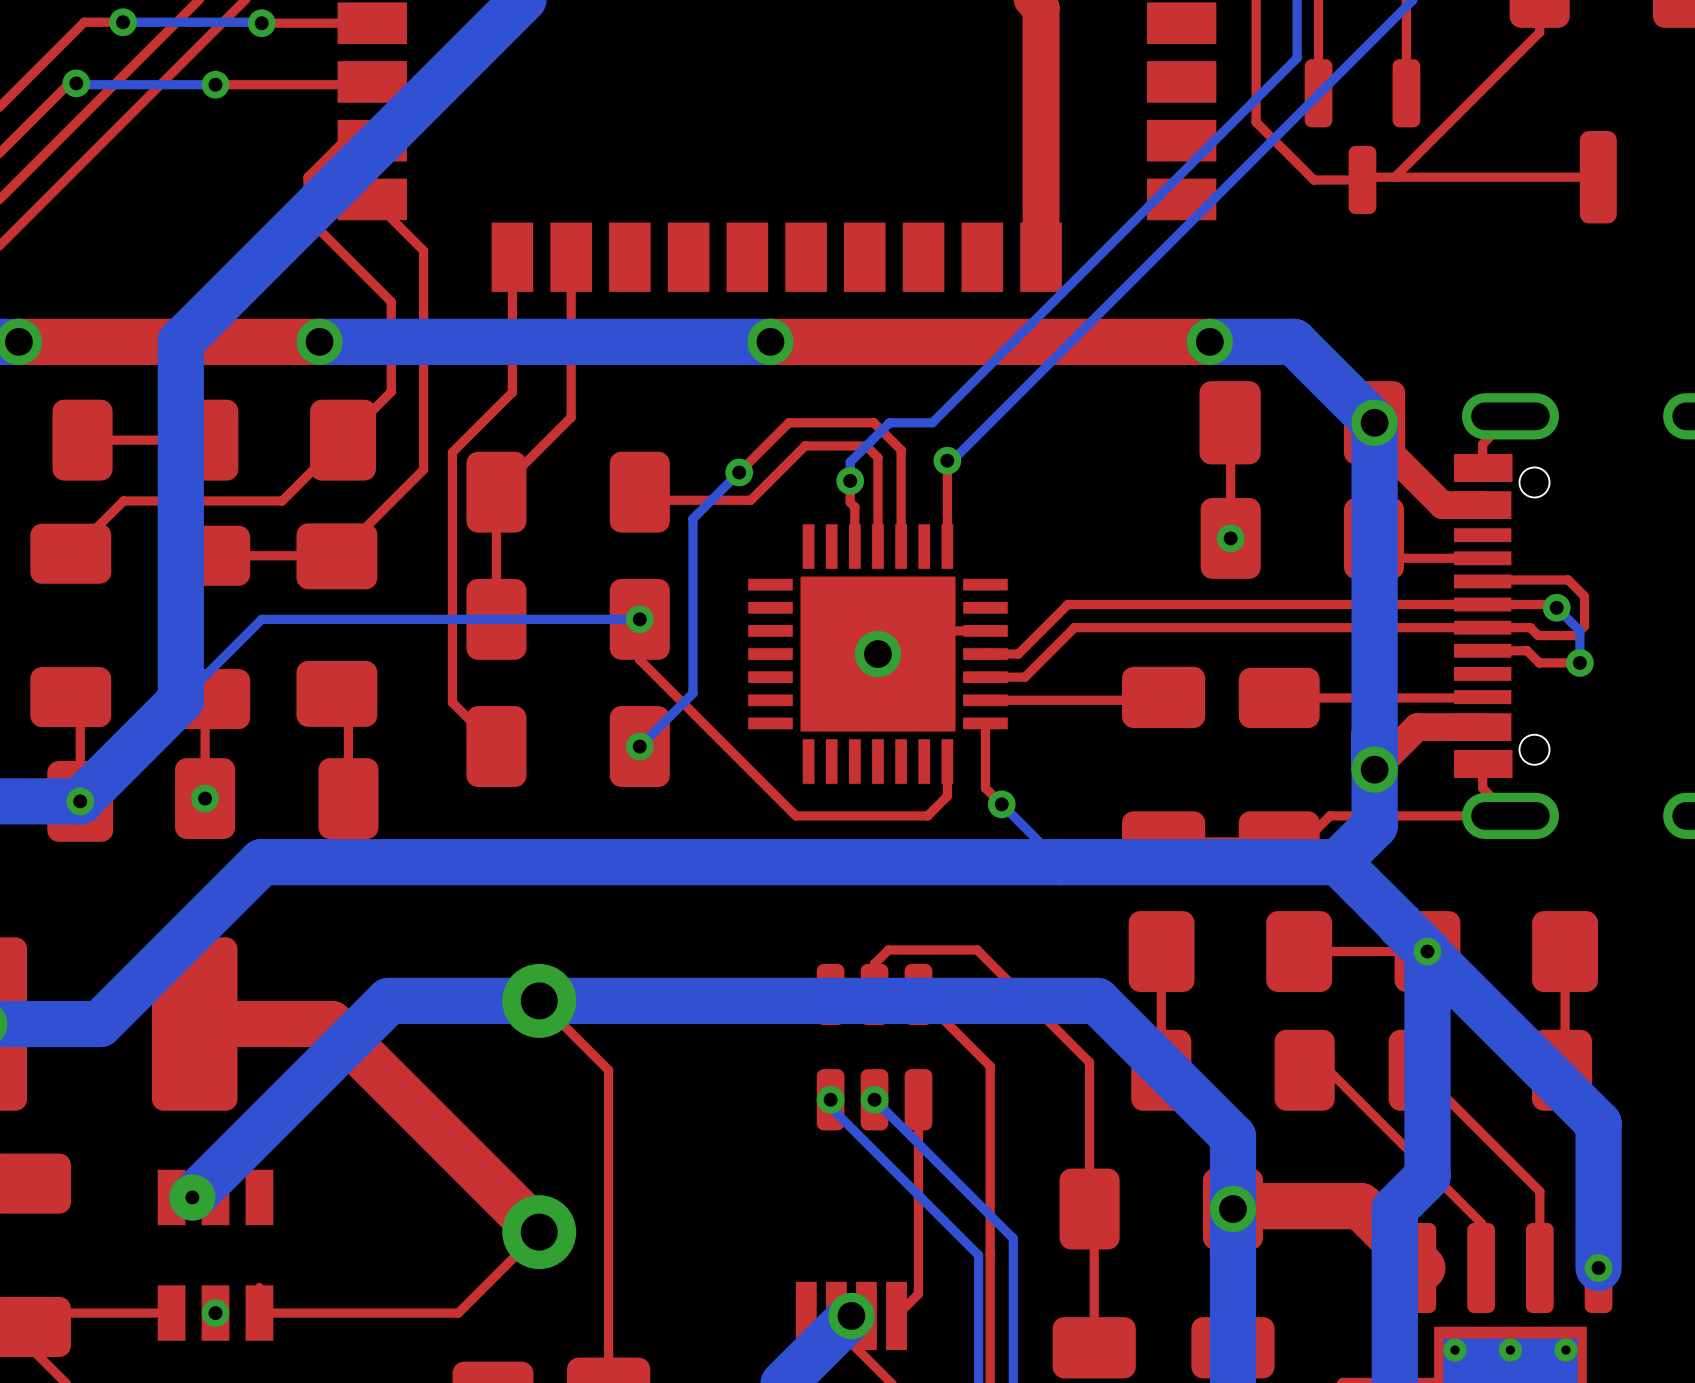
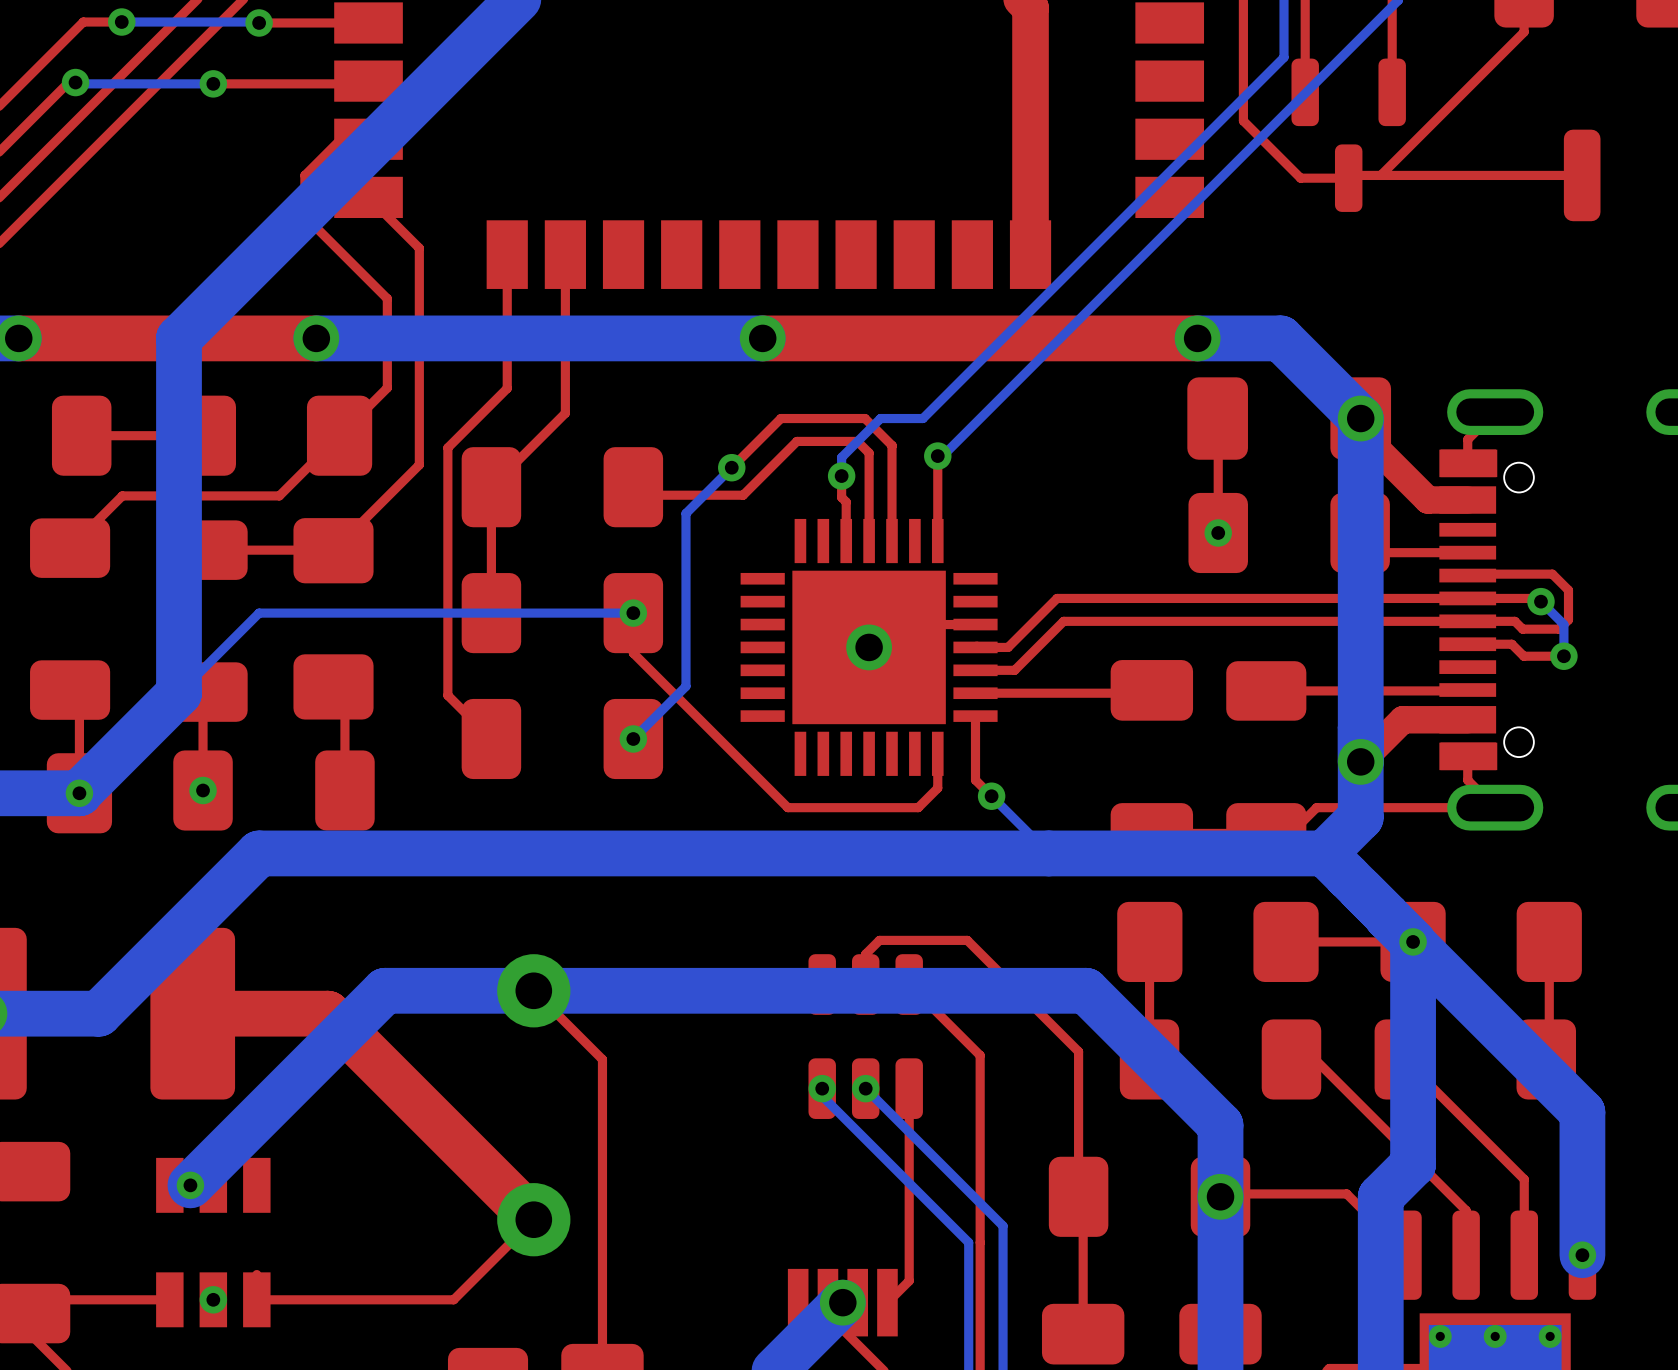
via size: [169, 1174, 216, 1221] -> [176, 1171, 205, 1200]
top track width: thick (1235, 1206) (1360, 1206) (1422, 1267) -> thin (1223, 1193) (1346, 1193) (1407, 1255)

